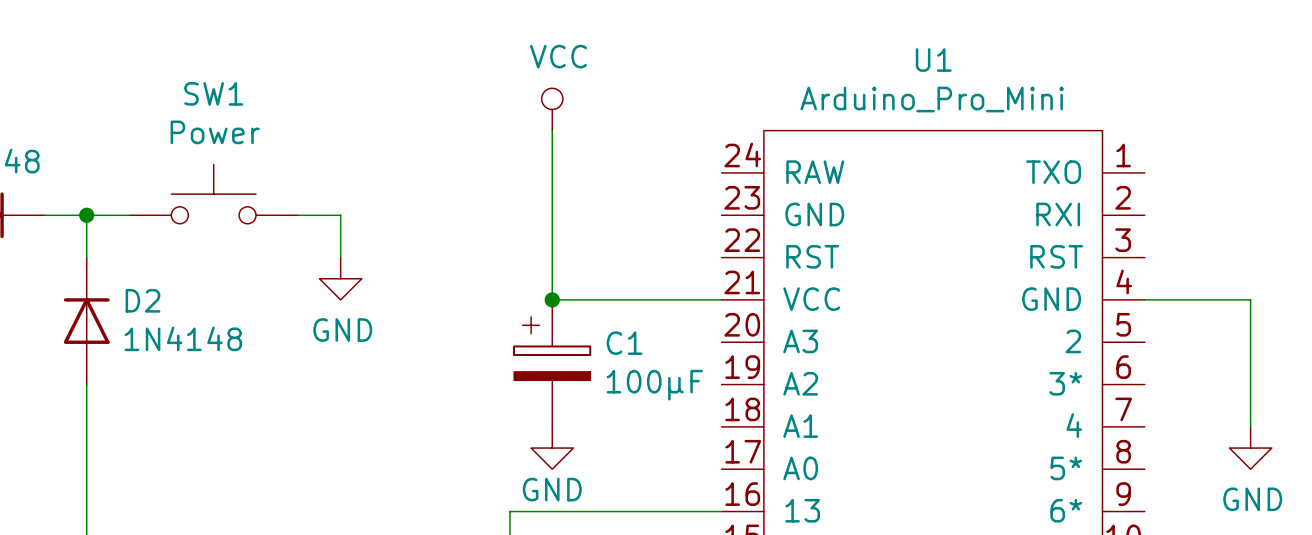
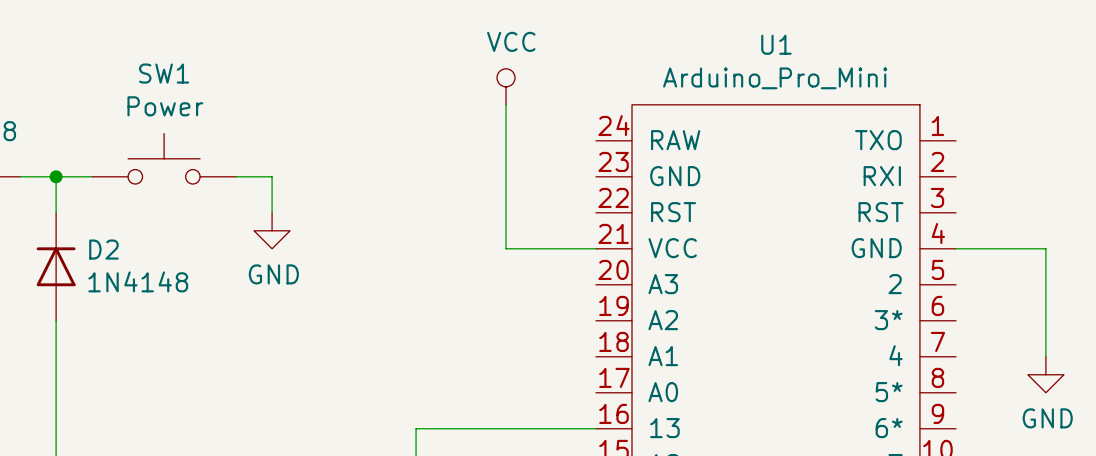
power symbol position: VCC (552, 109) -> VCC (506, 86)
wire: (552, 130) (552, 299) (615, 299) -> (506, 104) (506, 248)
junction: (552, 299) -> none
C1: 100µF (552, 363) -> none
power symbol: GND (552, 448) -> none

